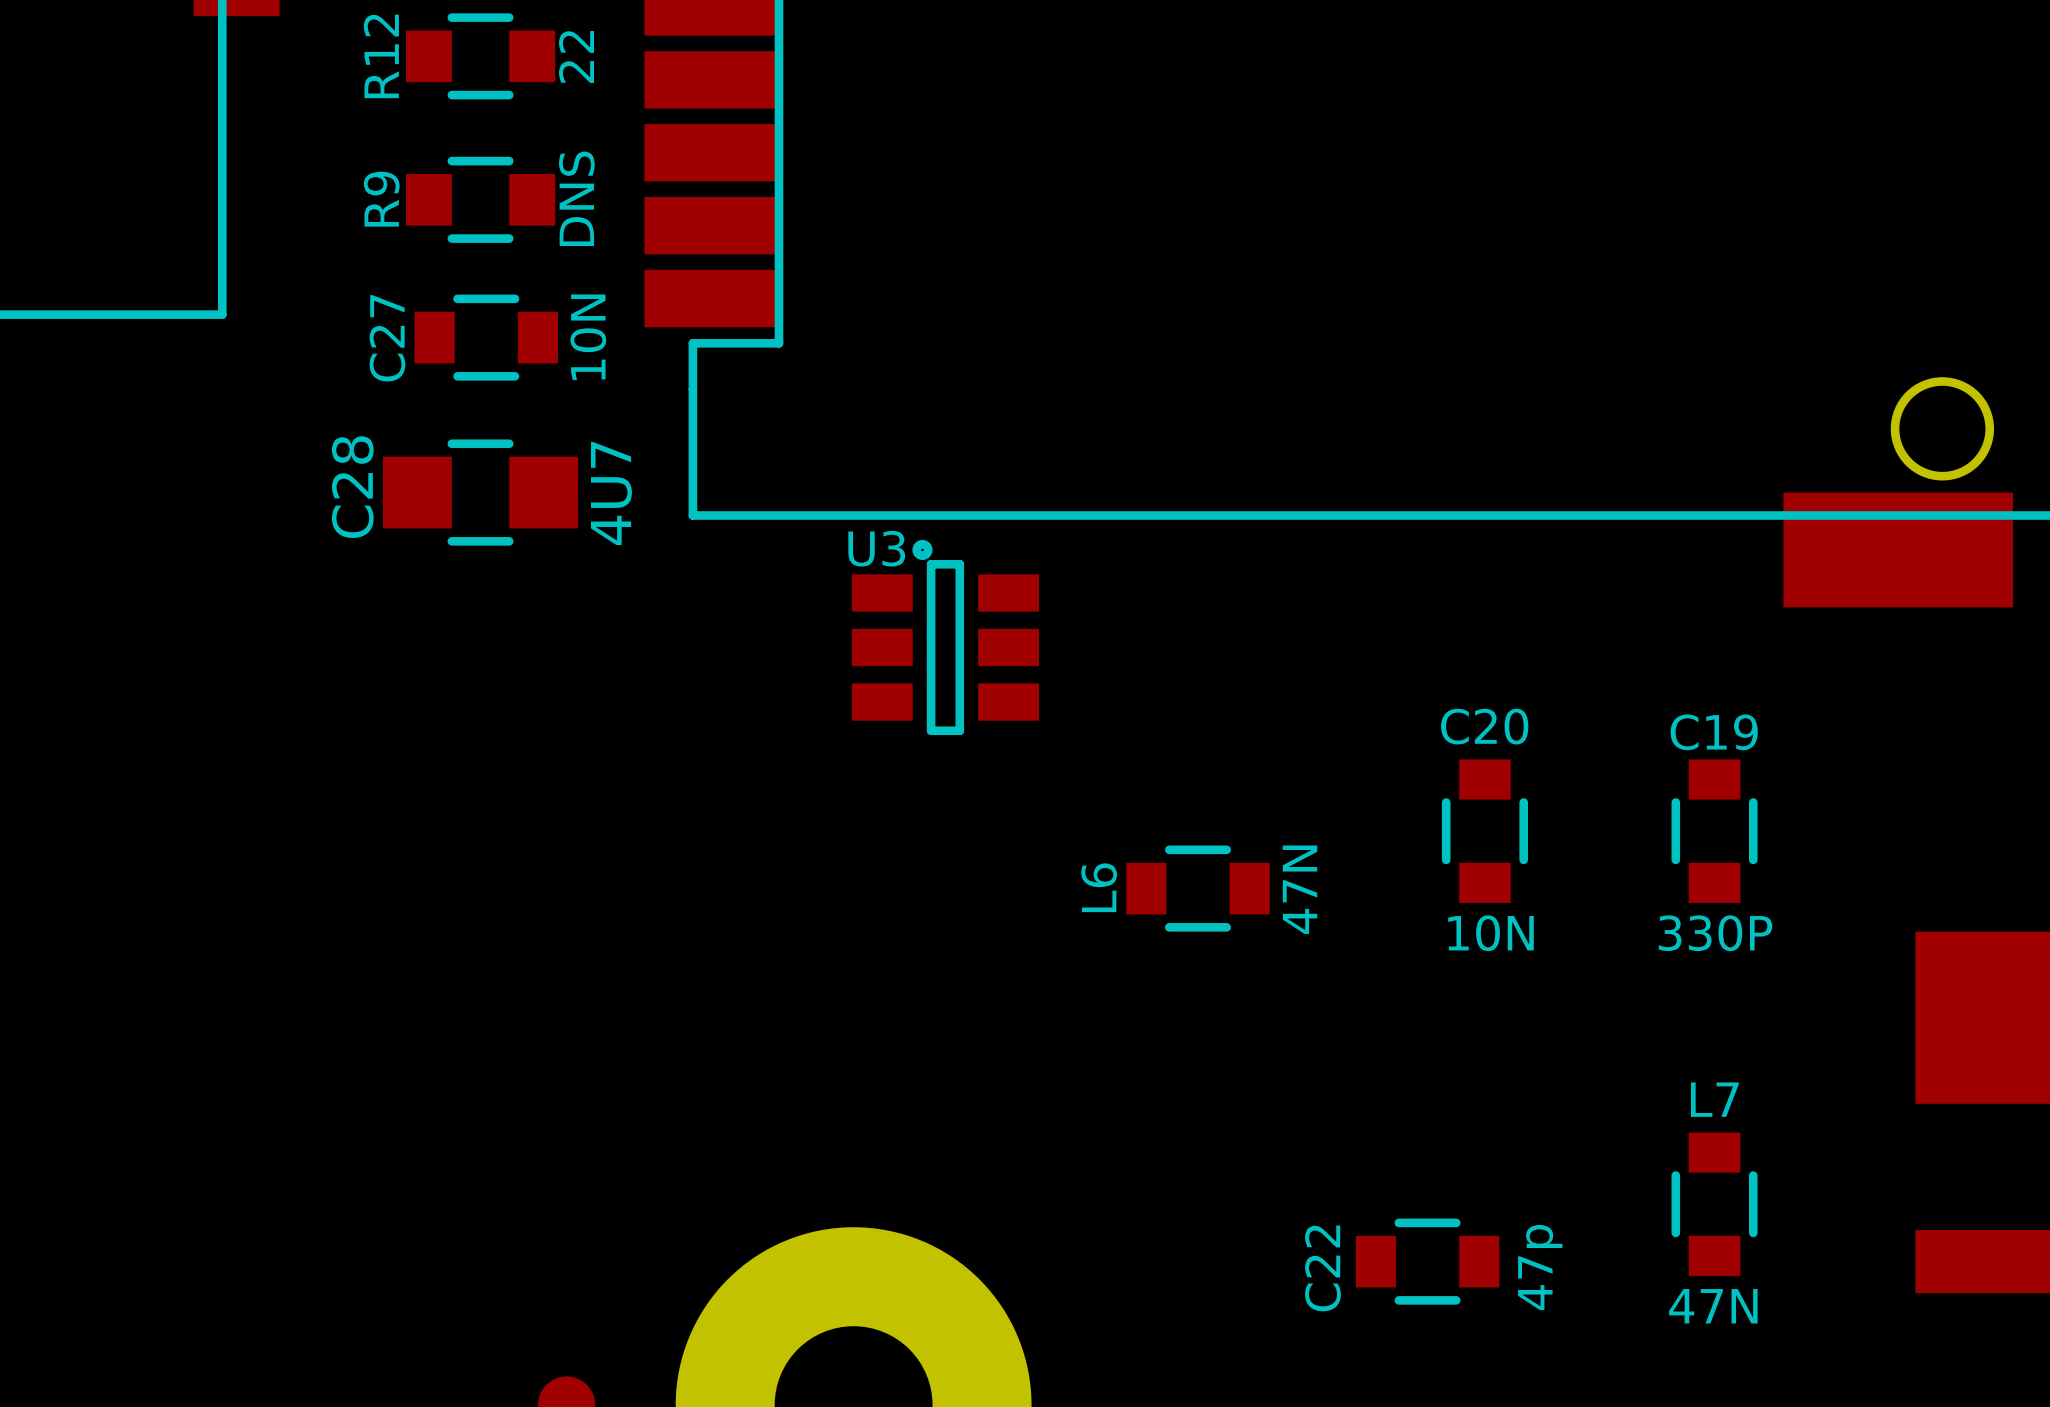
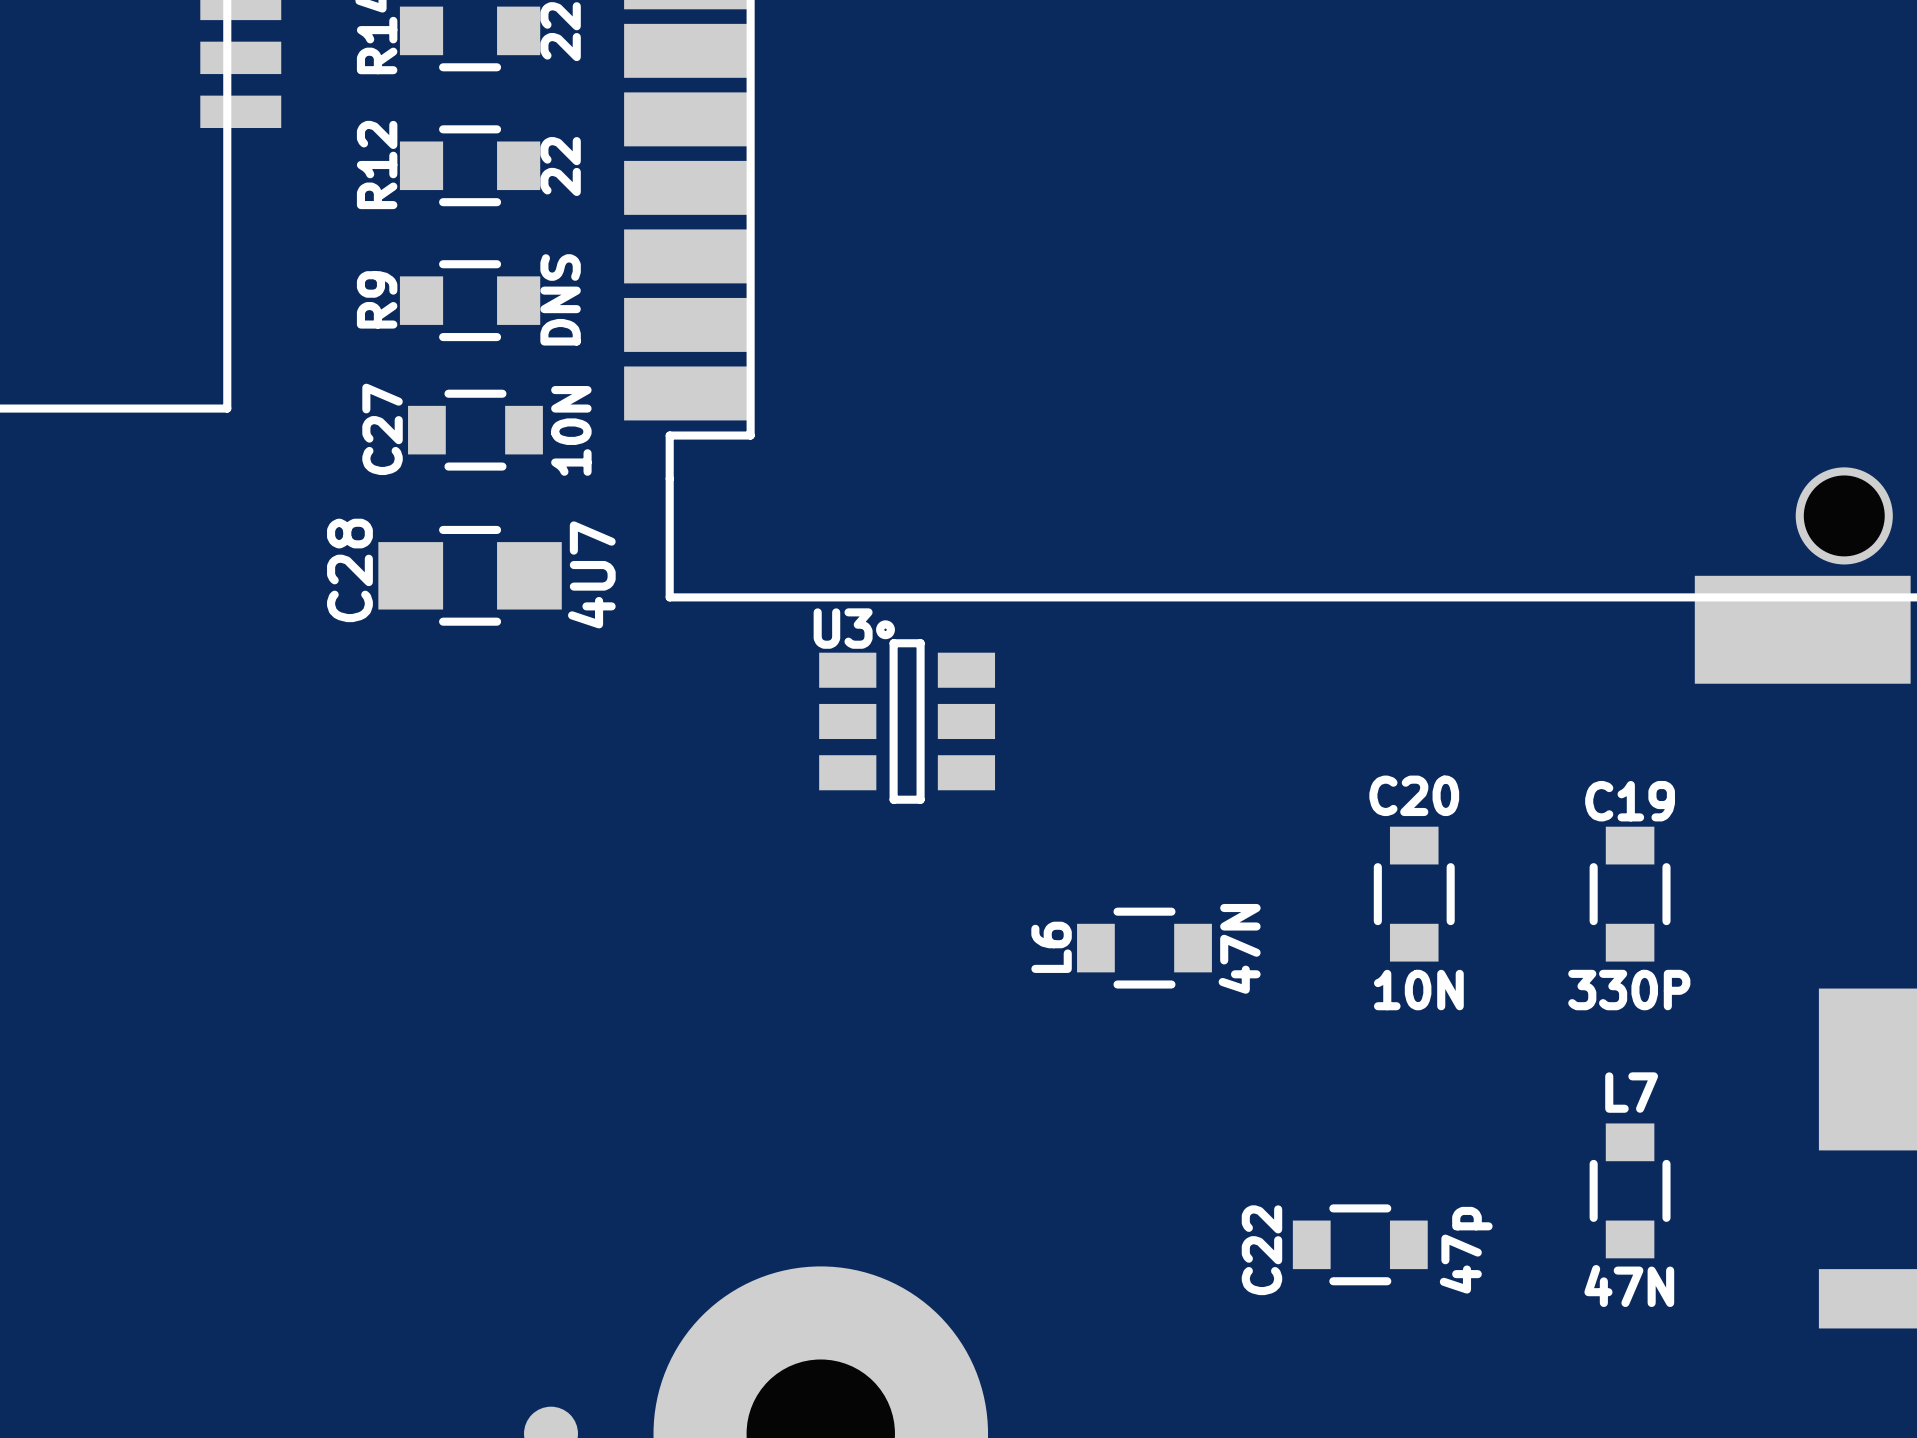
L7 position: (1714, 1204) -> (1630, 1190)
C22 position: (1427, 1261) -> (1360, 1244)

